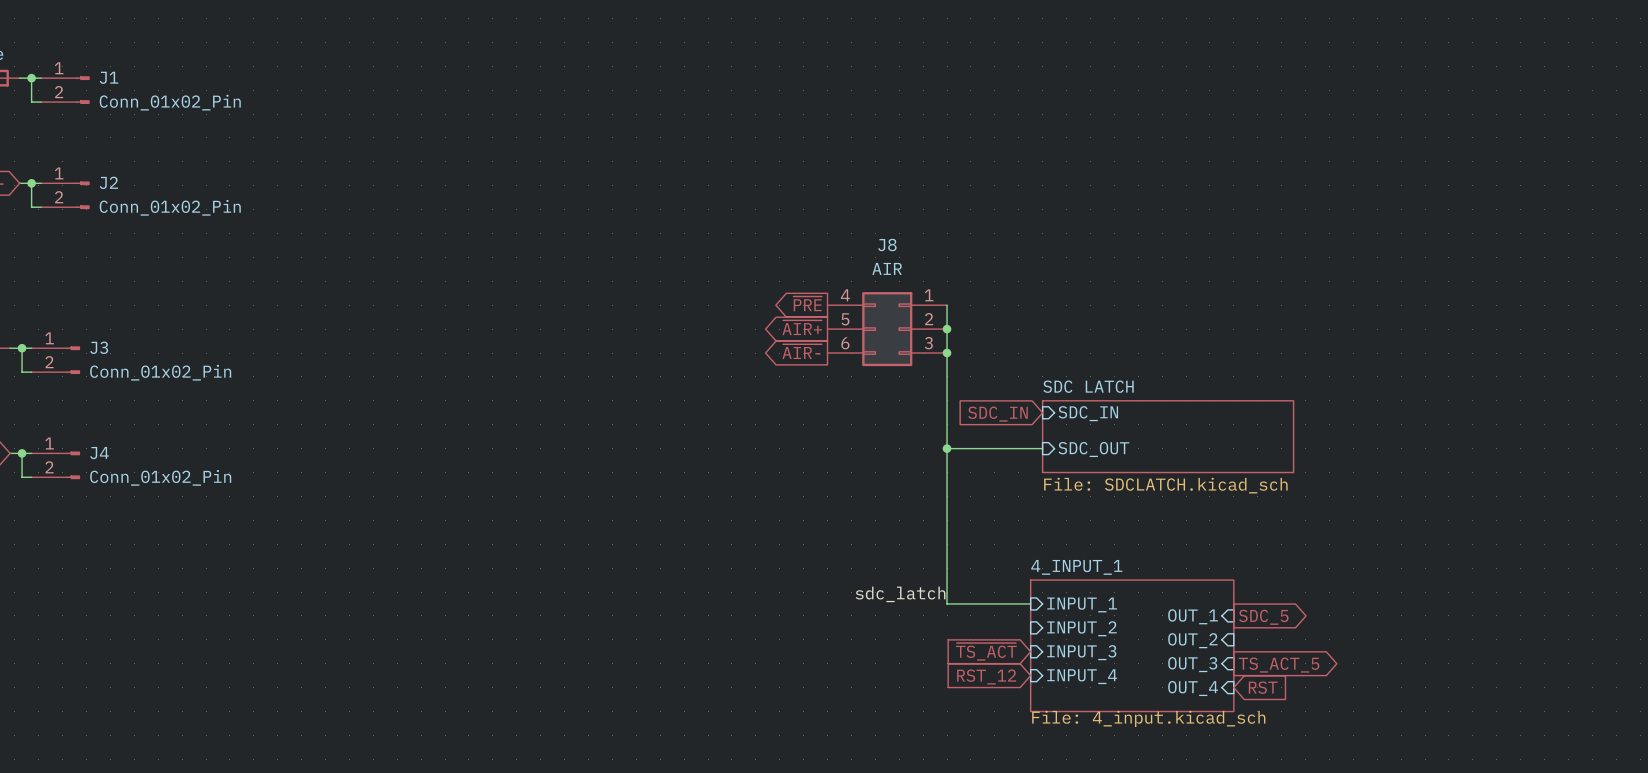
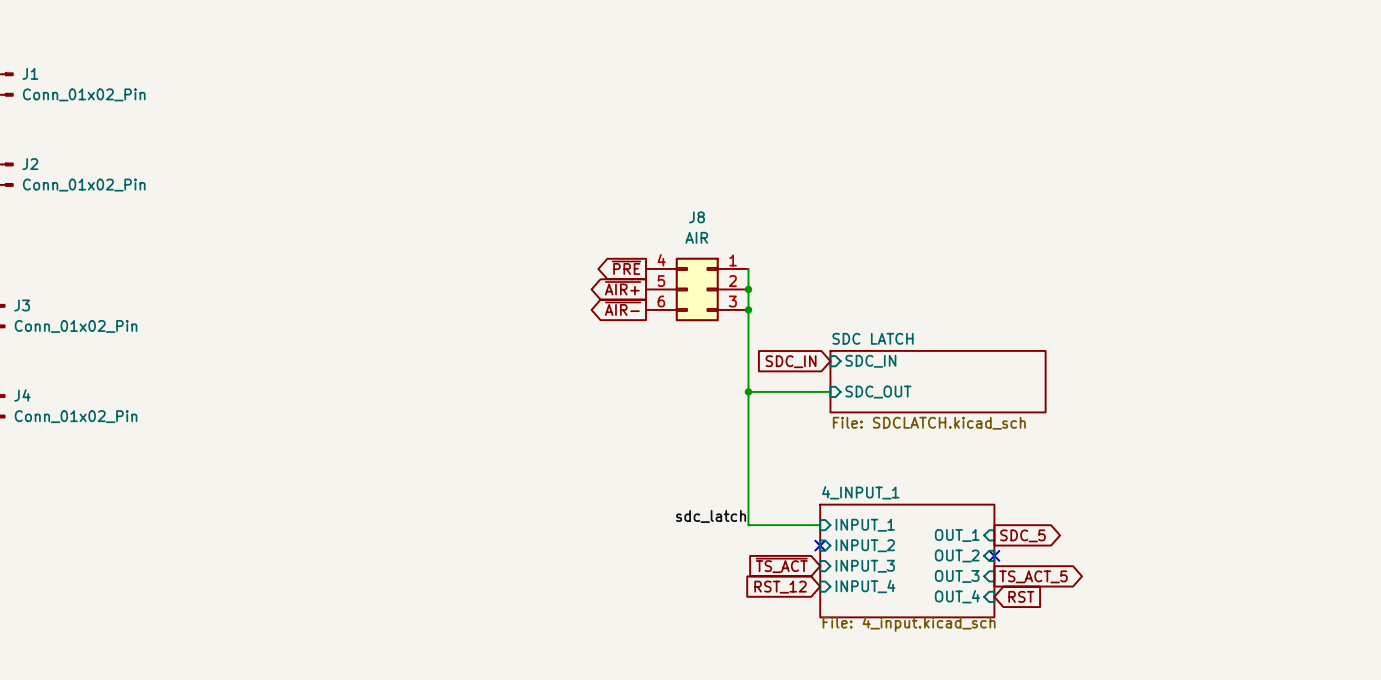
no-connect mark: none -> (820, 545)
no-connect mark: none -> (994, 555)

